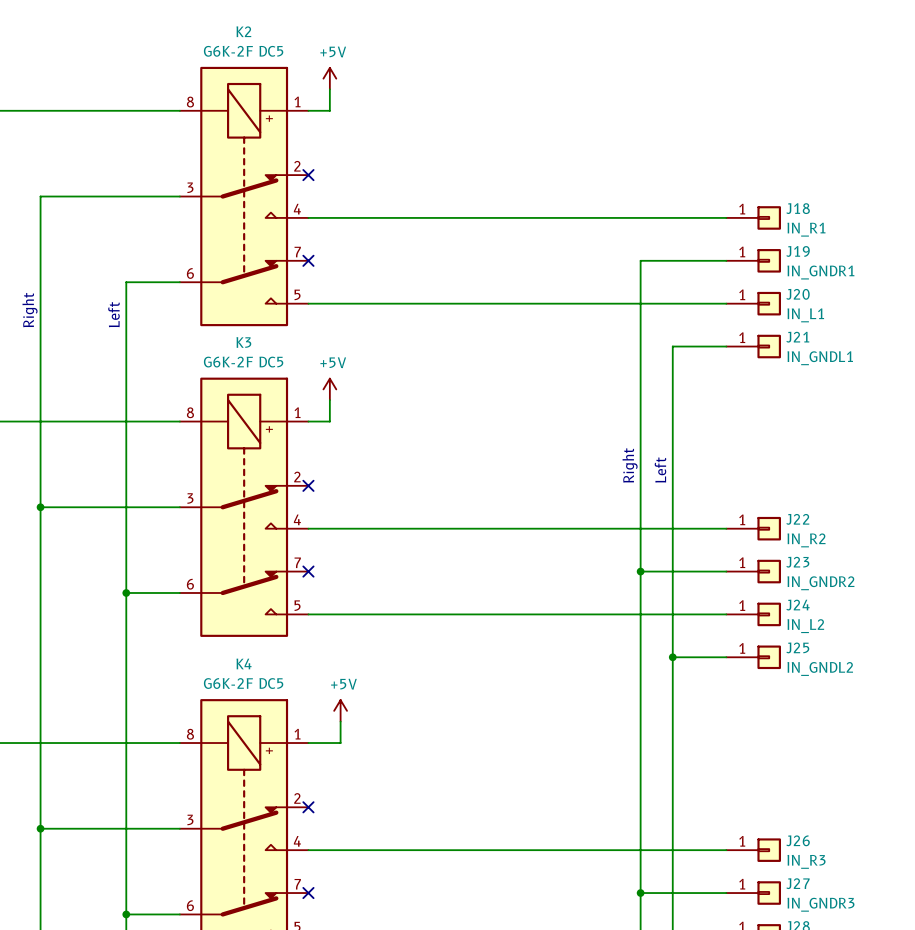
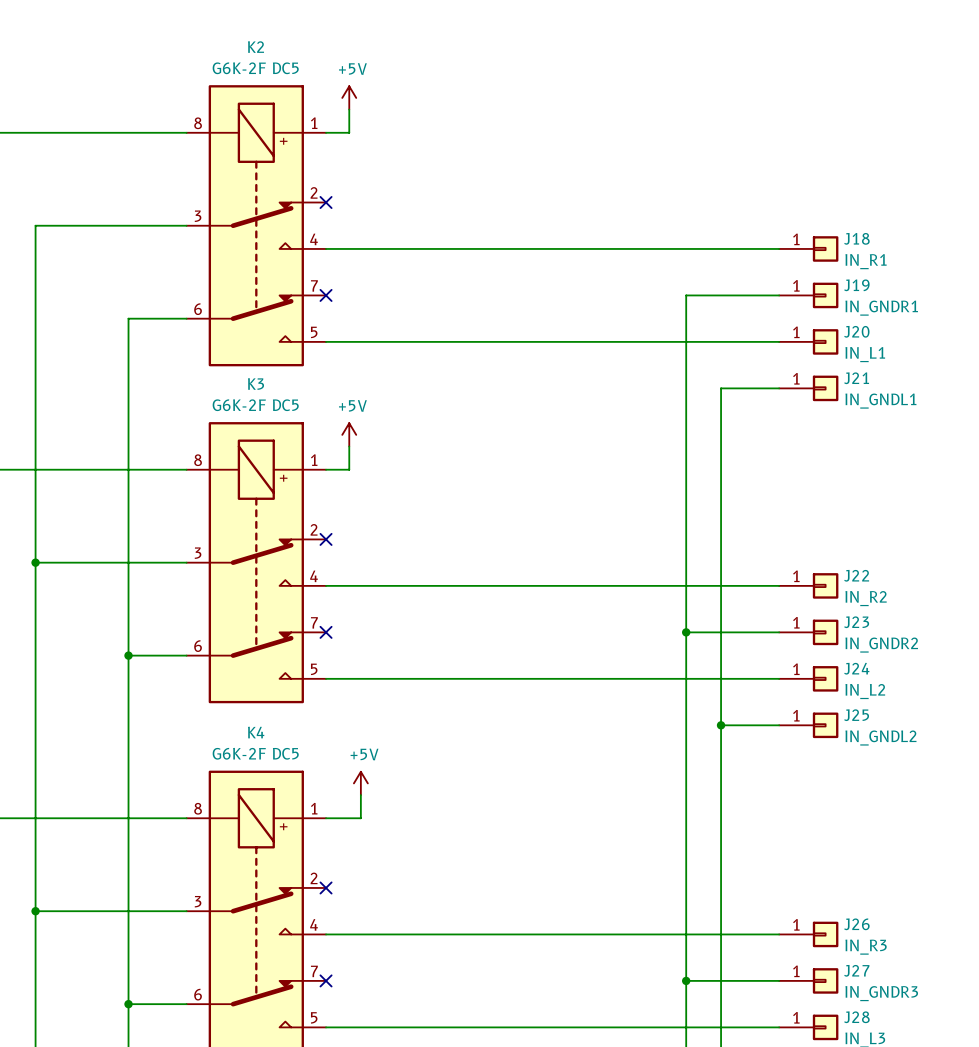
text: Right (30, 310) -> none
text: Left (113, 314) -> none
text: Right (630, 465) -> none
text: Left (660, 470) -> none

